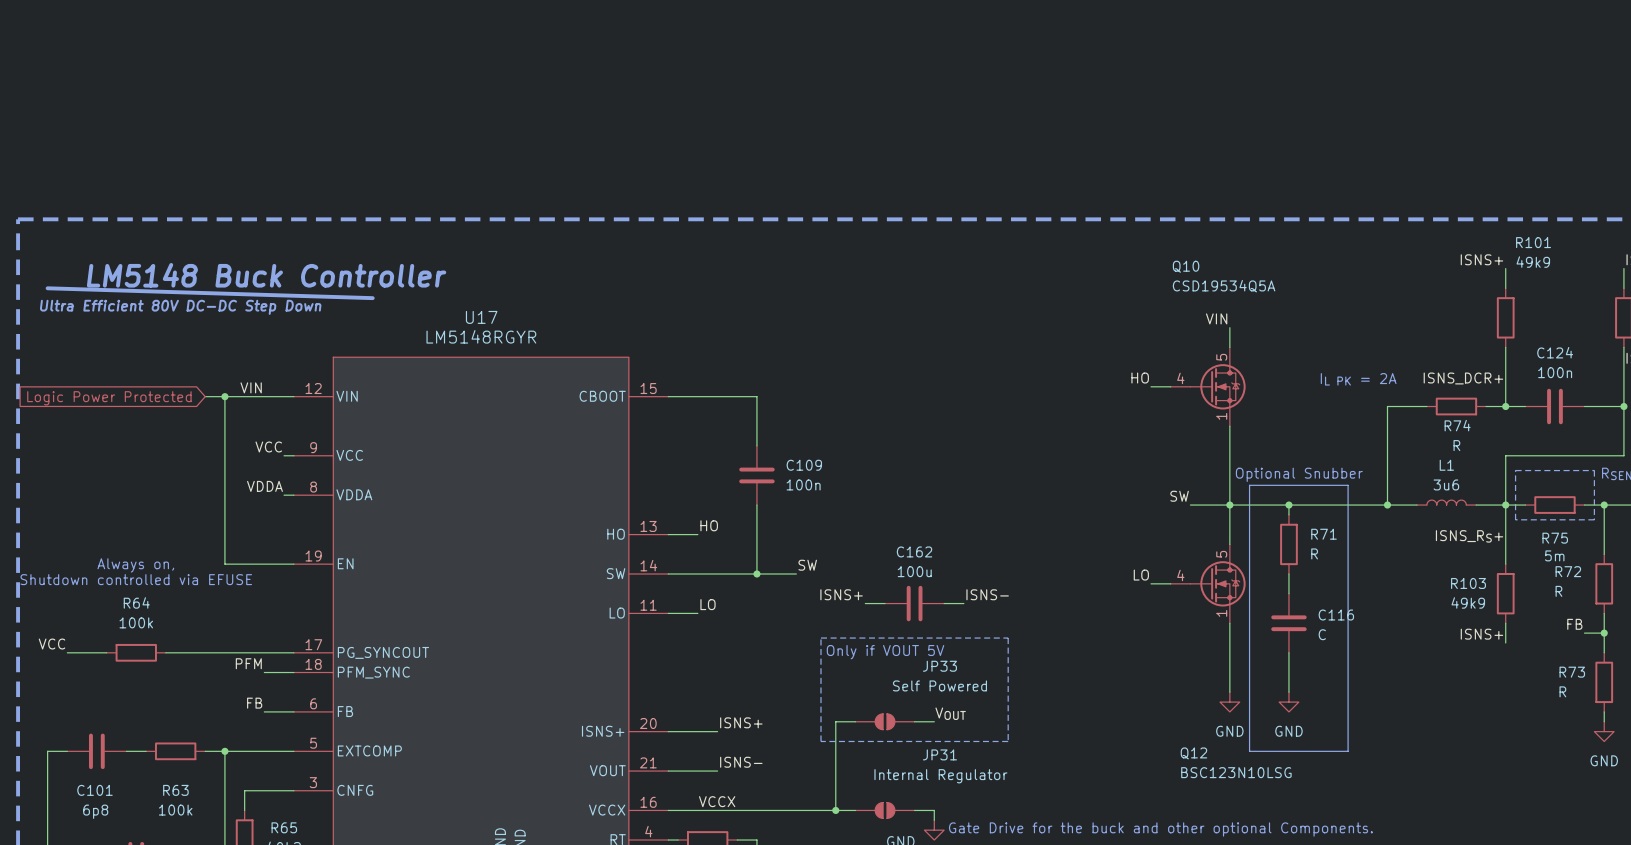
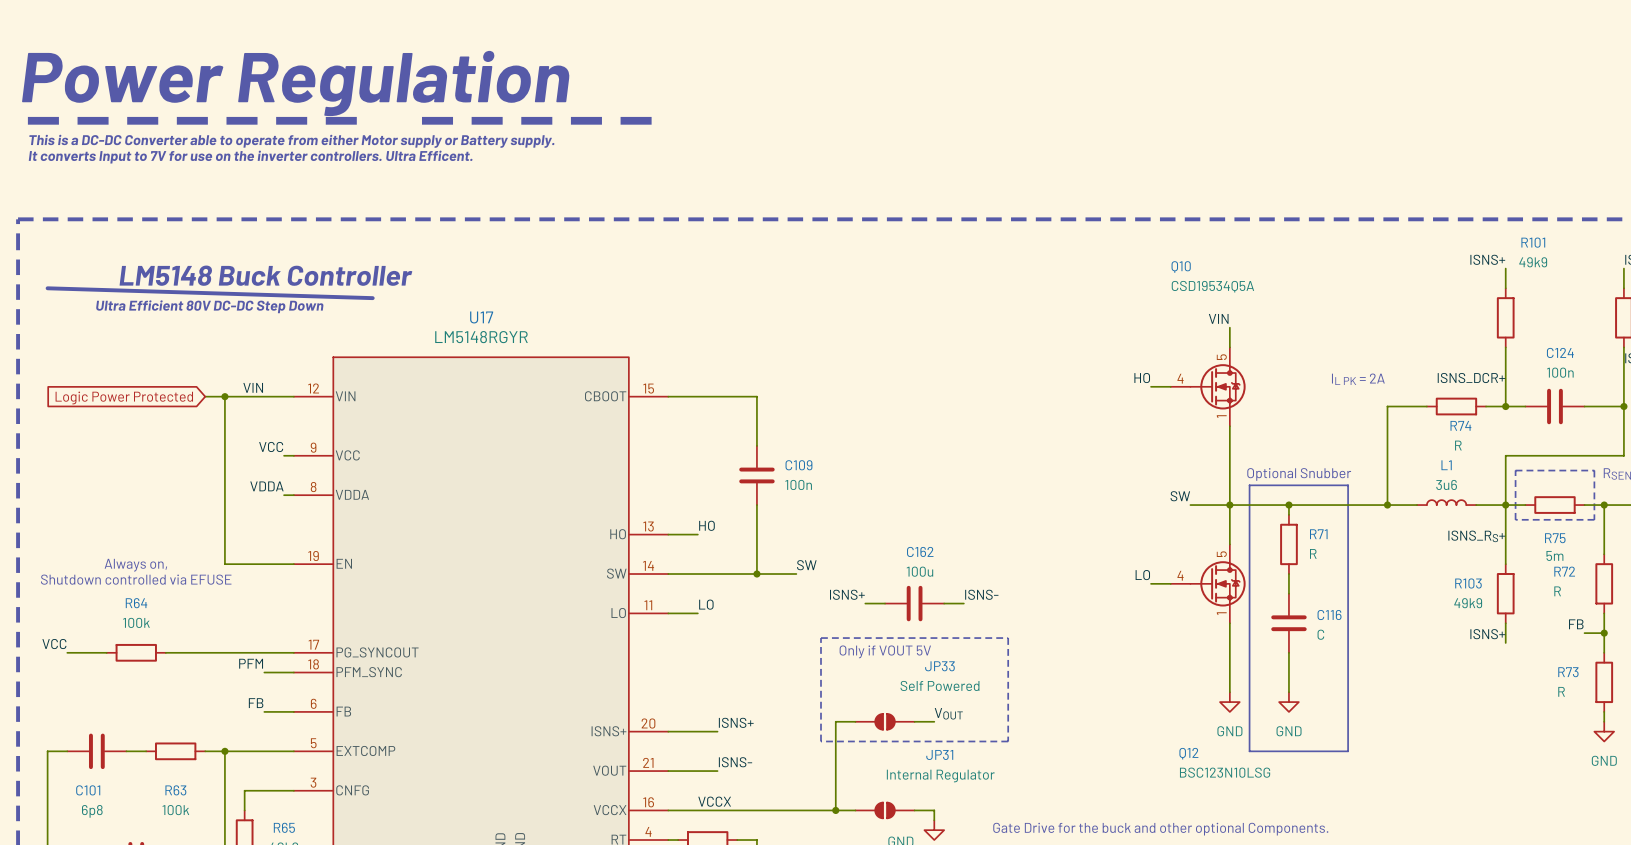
text: none -> Power Regulation (295, 83)
line: none -> (27, 120) (362, 120)
line: none -> (421, 120) (658, 120)
text: none -> This is a DC-DC Converter able to operate from either Motor supply or Battery supply. (291, 141)
text: none -> It converts Input to 7V for use on the inverter controllers. Ultra Efficent. (250, 157)

